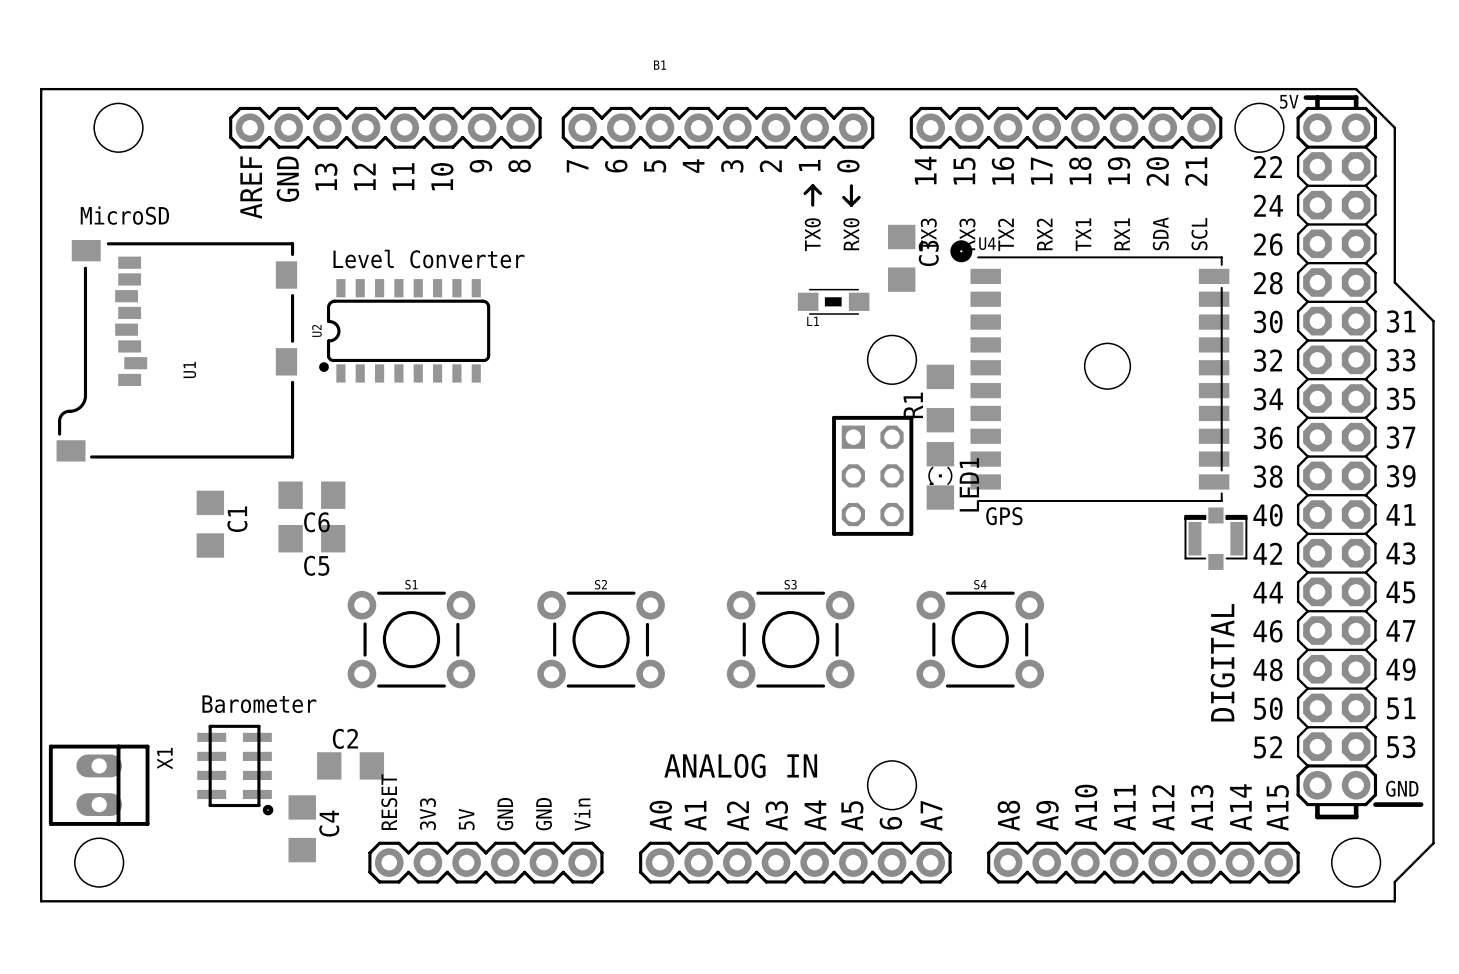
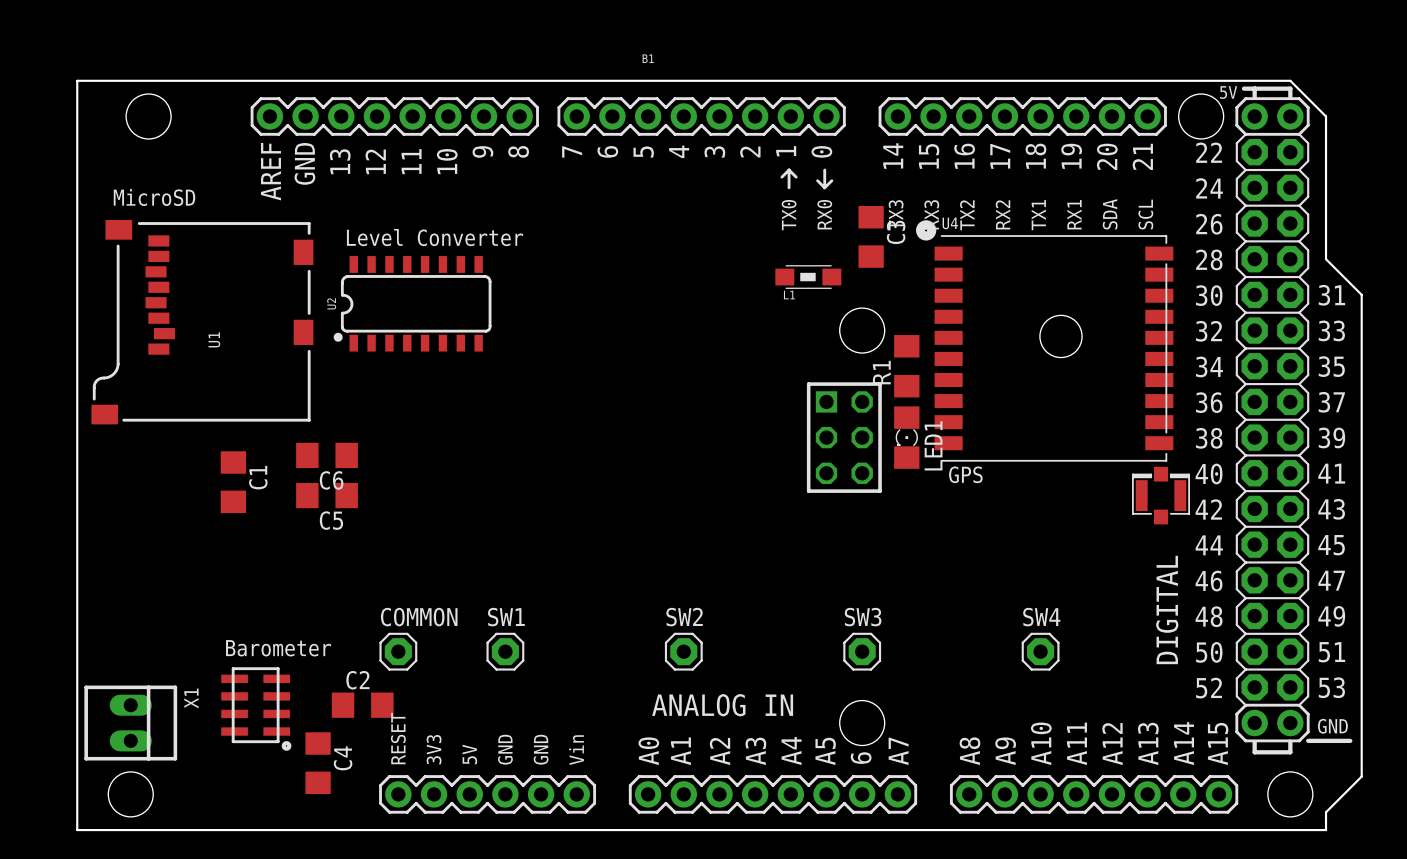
S1: (411, 639) -> none
S2: (601, 639) -> none
S3: (790, 639) -> none
S4: (980, 639) -> none
COMMON: none -> (398, 651)
SW1: none -> (505, 651)
SW2: none -> (683, 651)
SW3: none -> (862, 651)
SW4: none -> (1040, 651)

